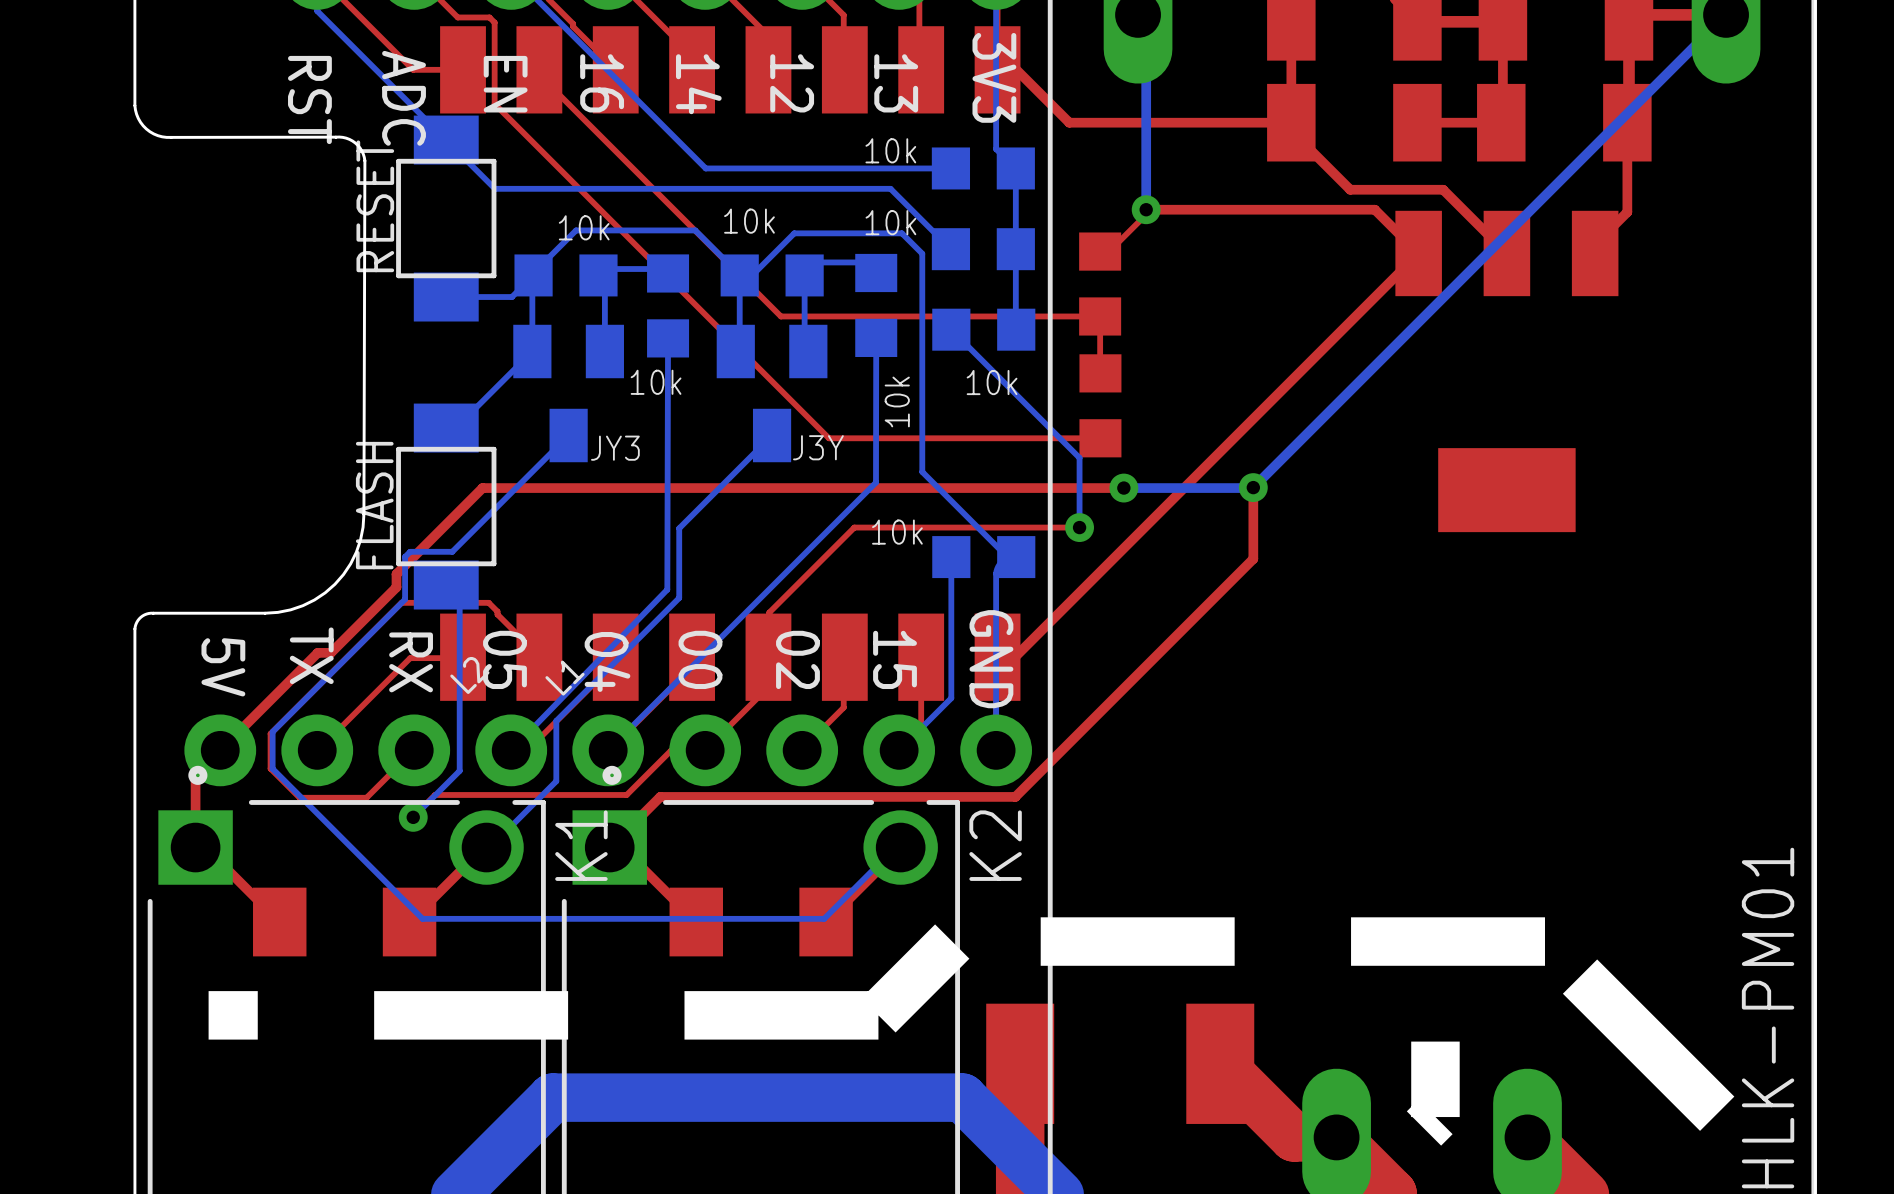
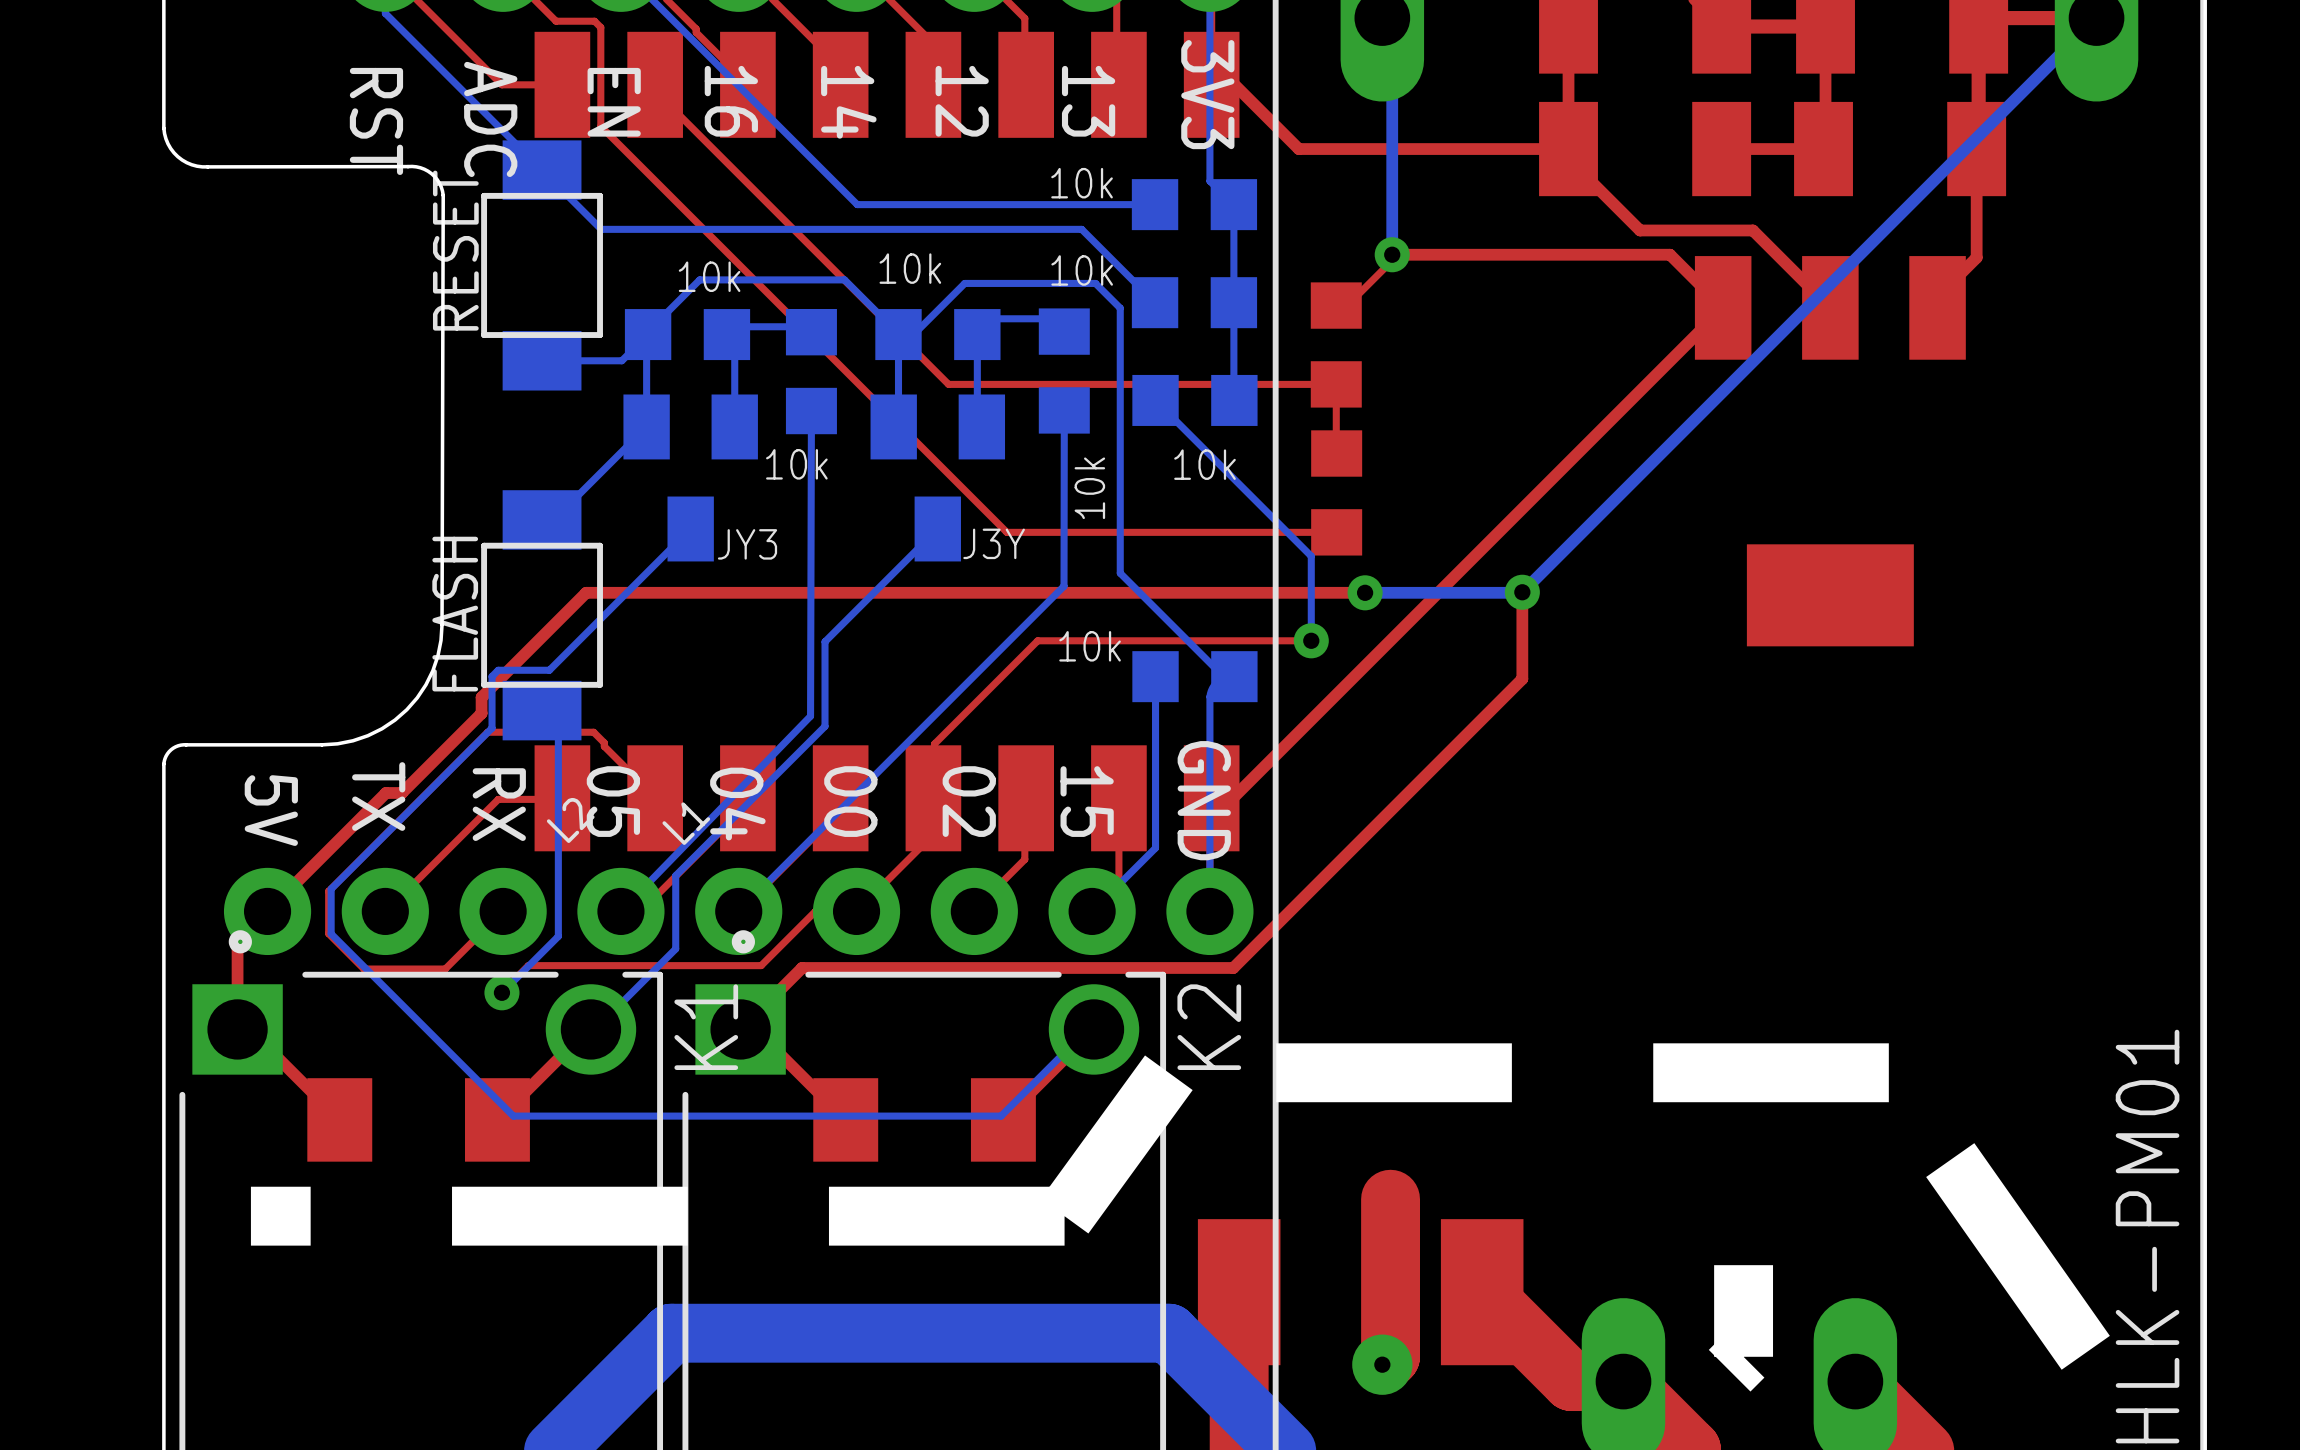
top track: none -> (1390, 1199) (1390, 1356) (1382, 1364)
board edge: (208, 1015) (878, 1015) (952, 941) (1545, 941) (1717, 1113) -> (250, 1216) (1064, 1216) (1168, 1072) (1888, 1072) (2085, 1352)
via: none -> (1382, 1364)

